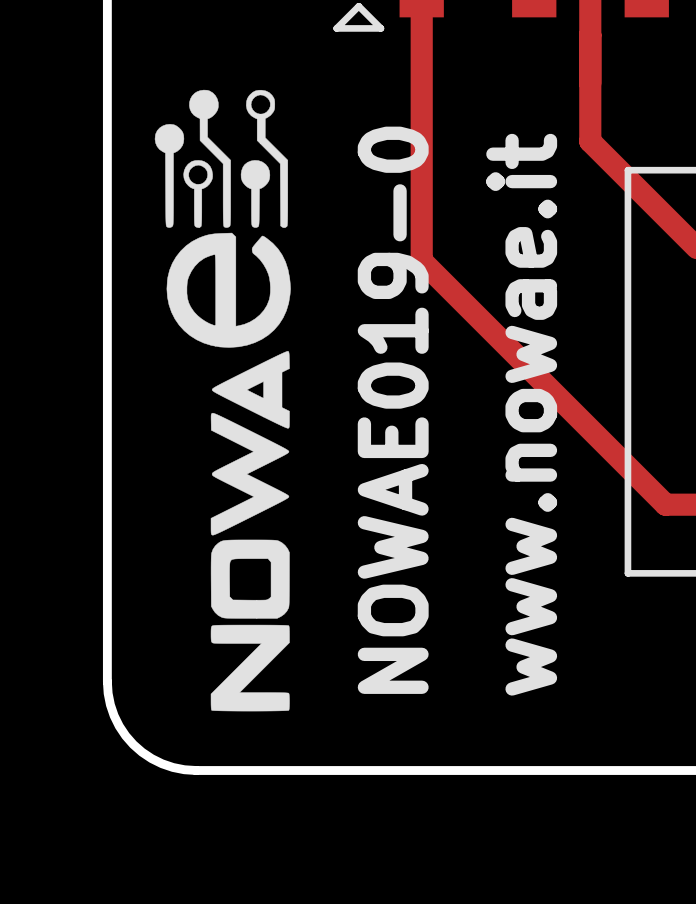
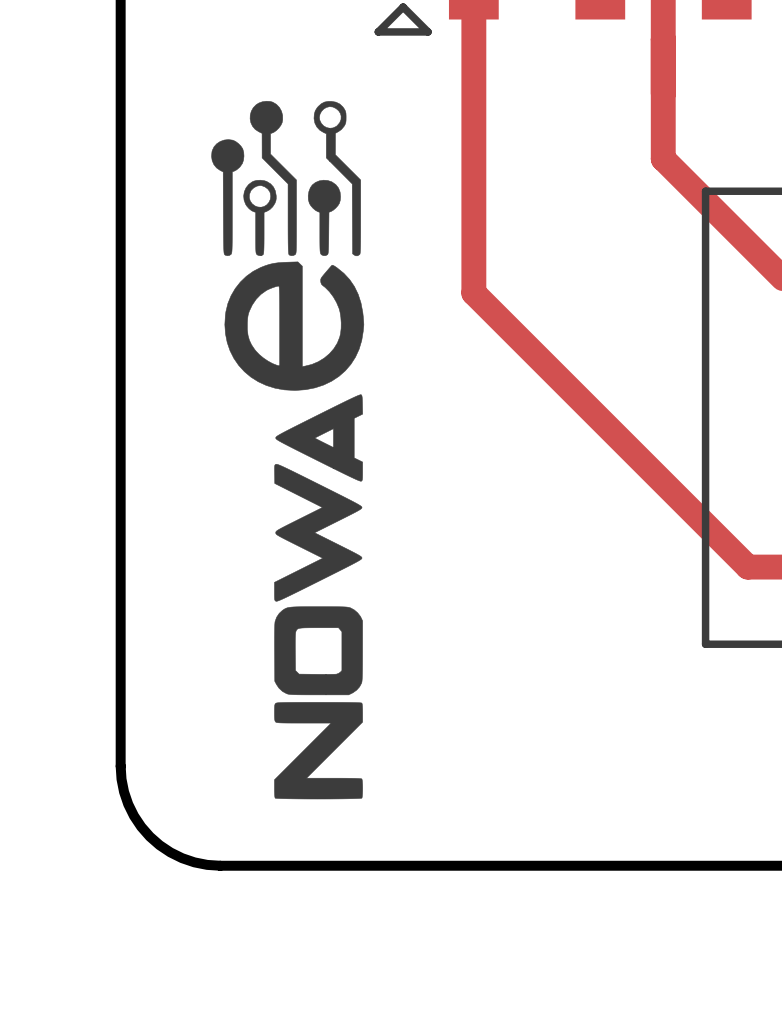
drawing position: (222, 400) -> (287, 450)
text: NOWAE019-0 (393, 410) -> none
text: www.nowae.it (521, 414) -> none

